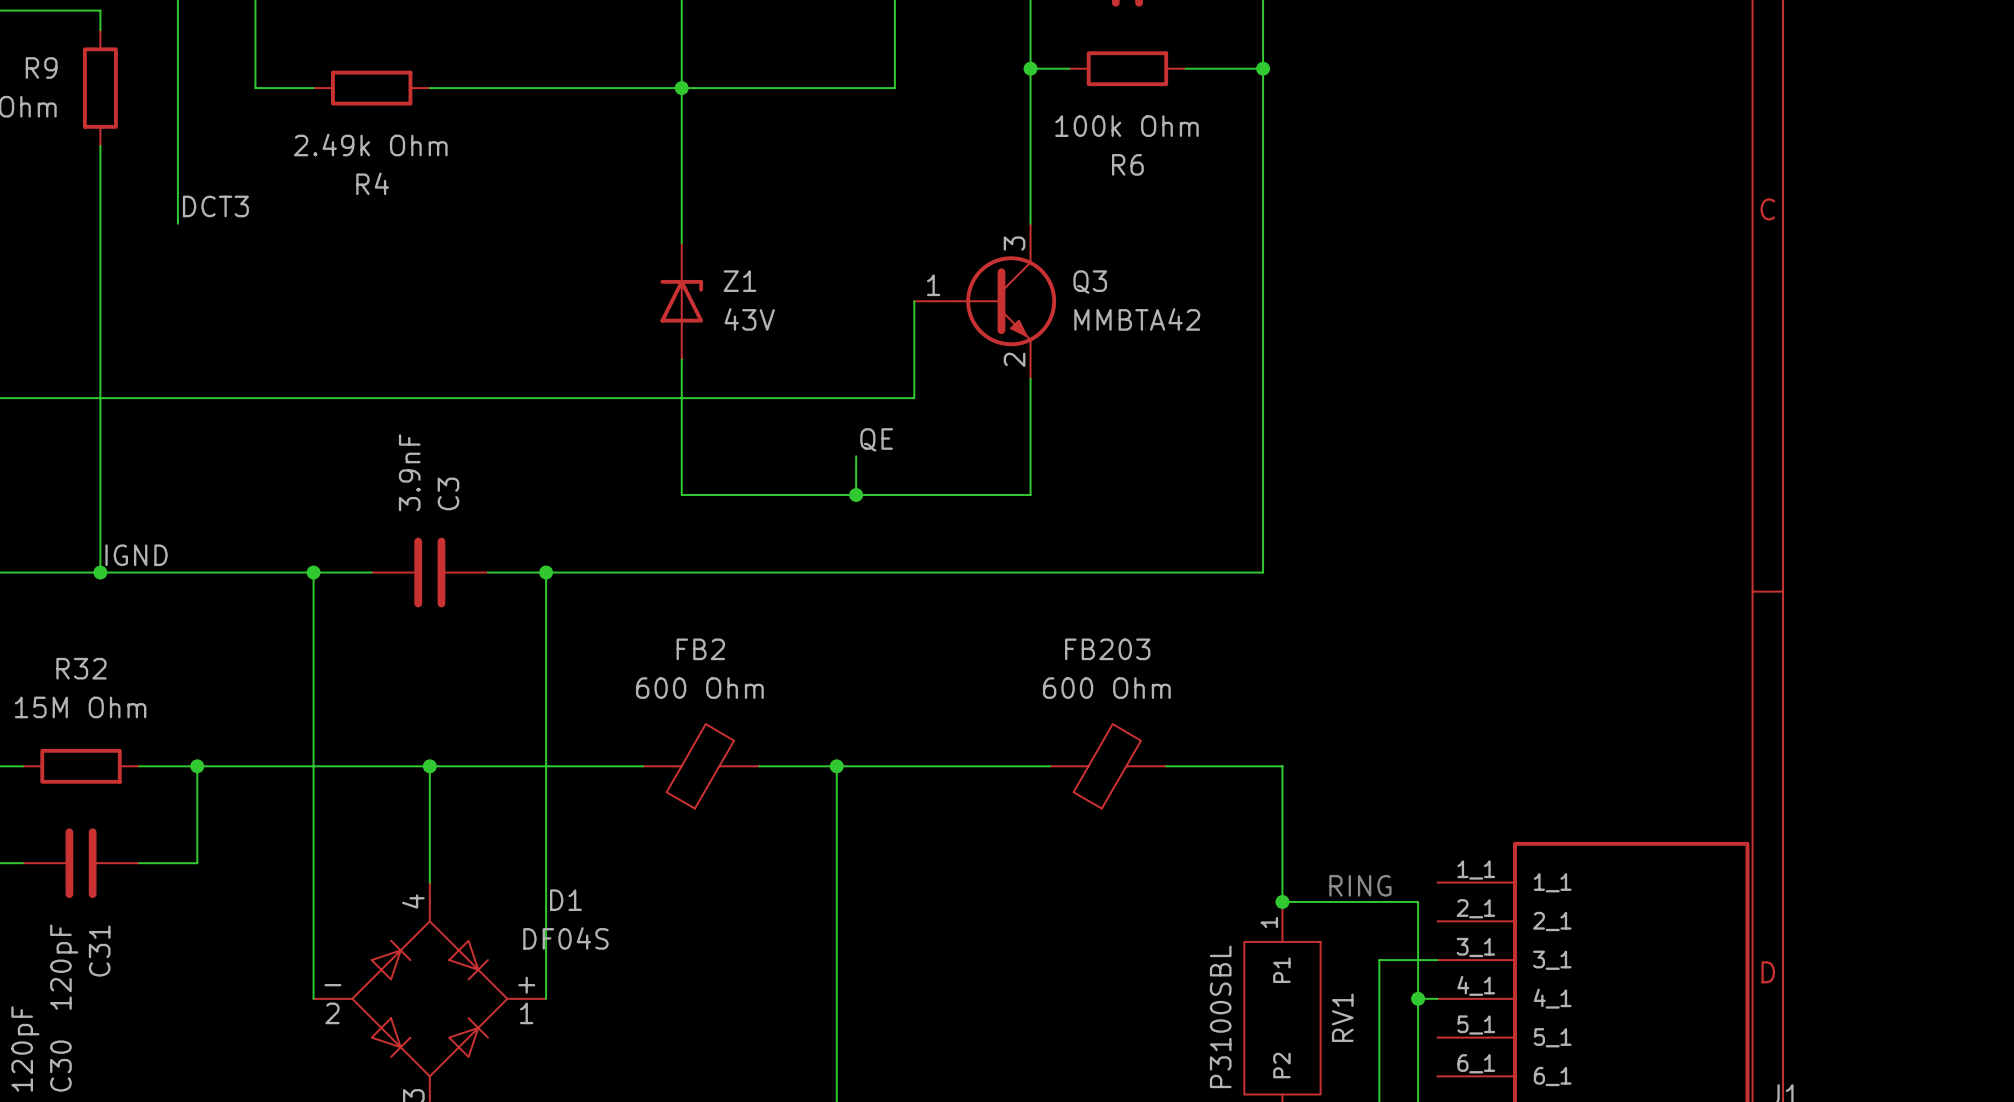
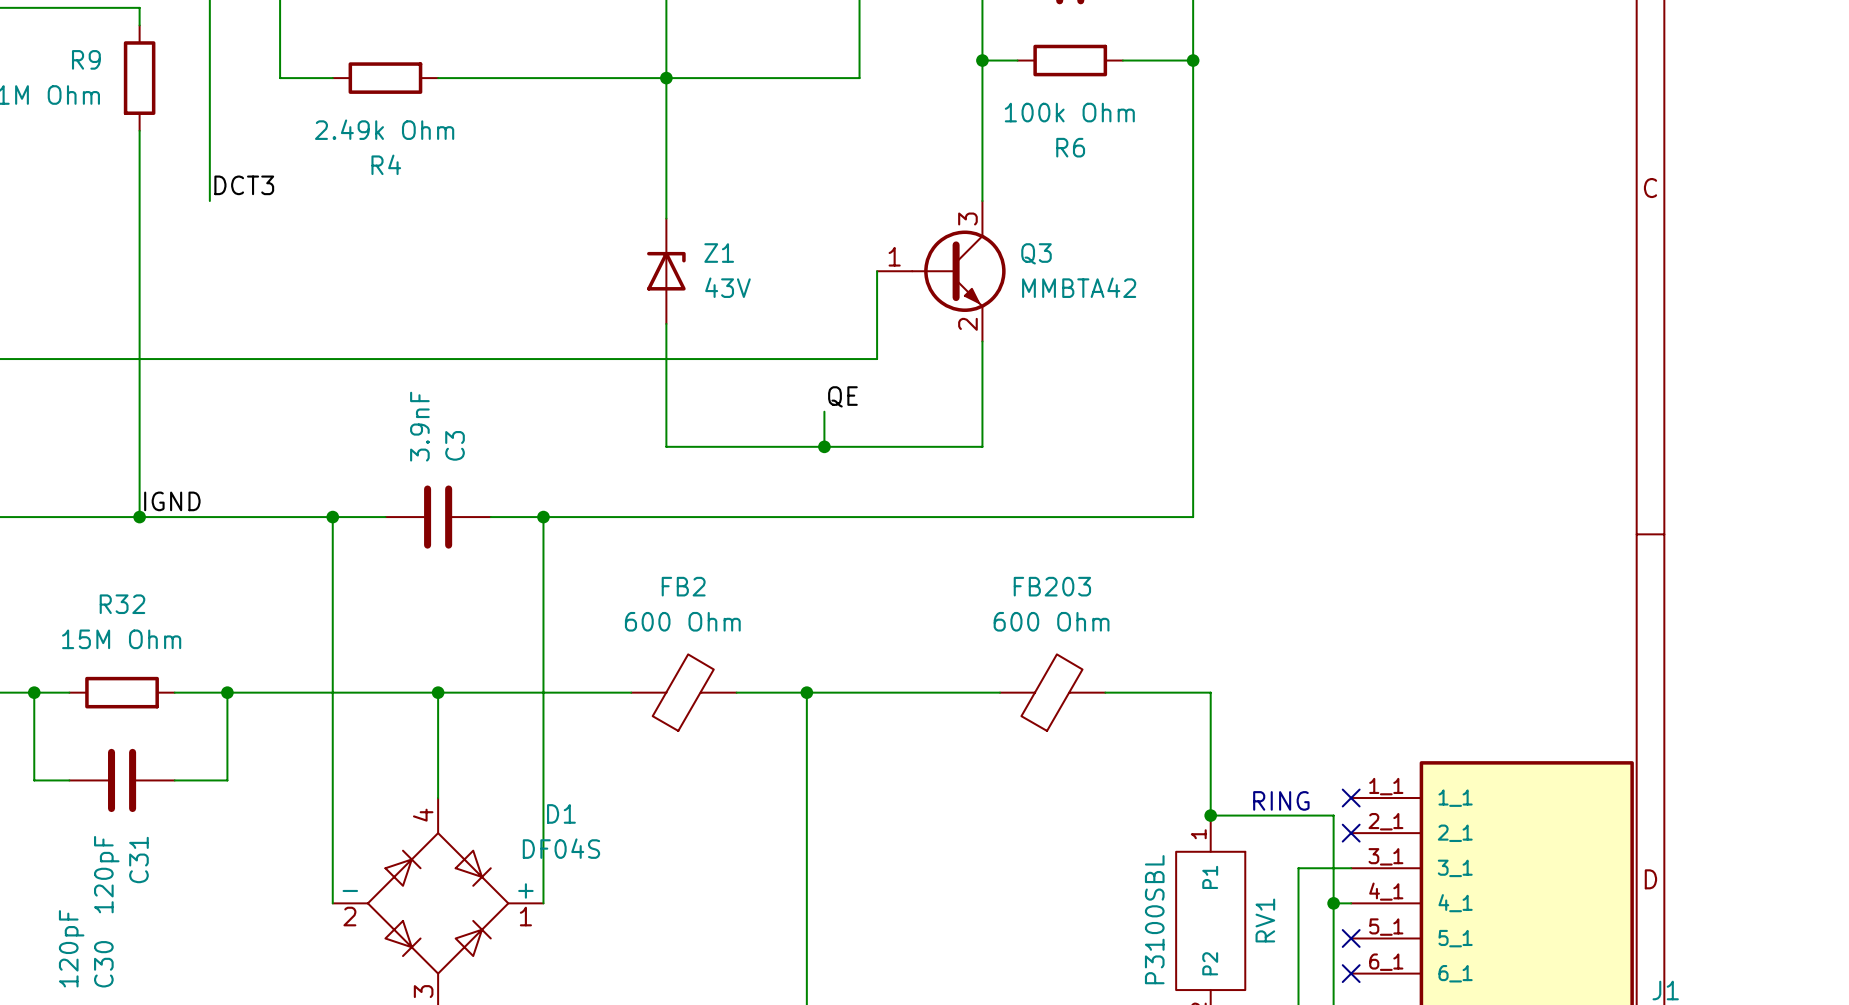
no-connect mark: none -> (1351, 798)
no-connect mark: none -> (1351, 833)
no-connect mark: none -> (1351, 938)
no-connect mark: none -> (1351, 973)

